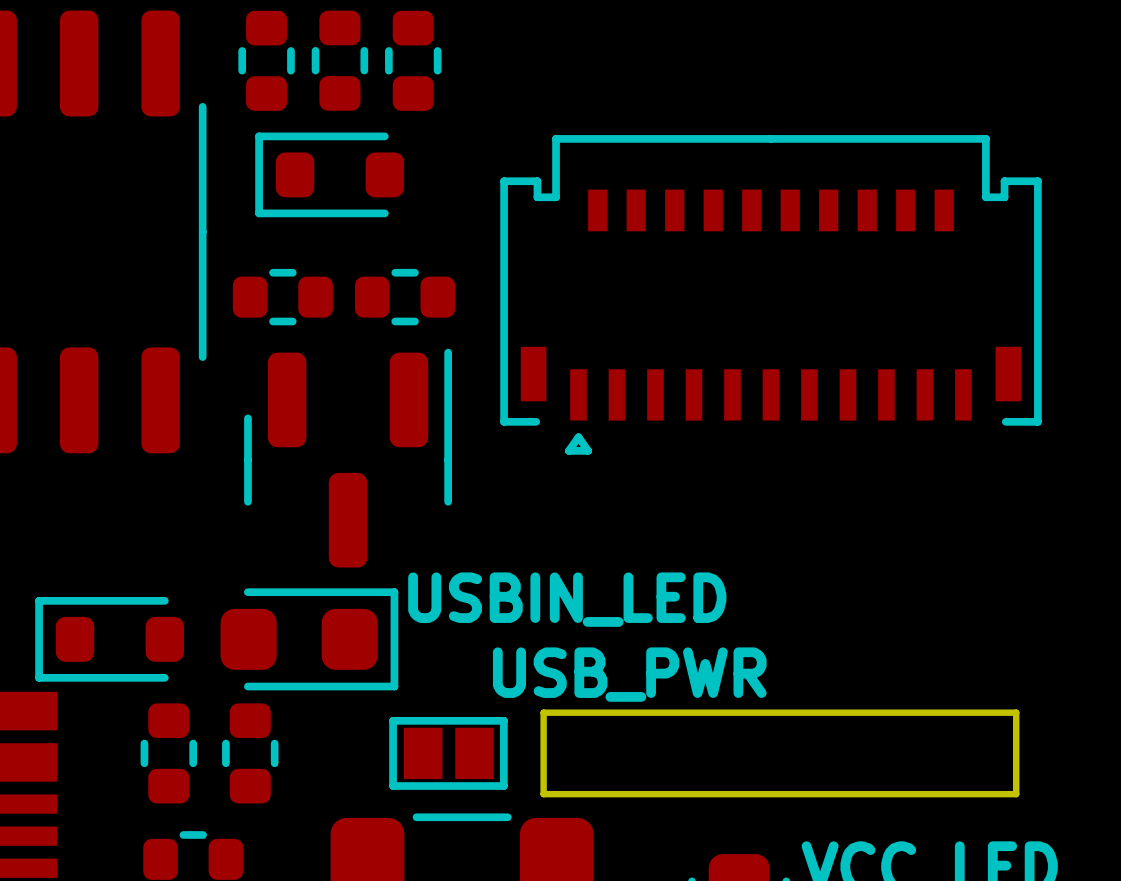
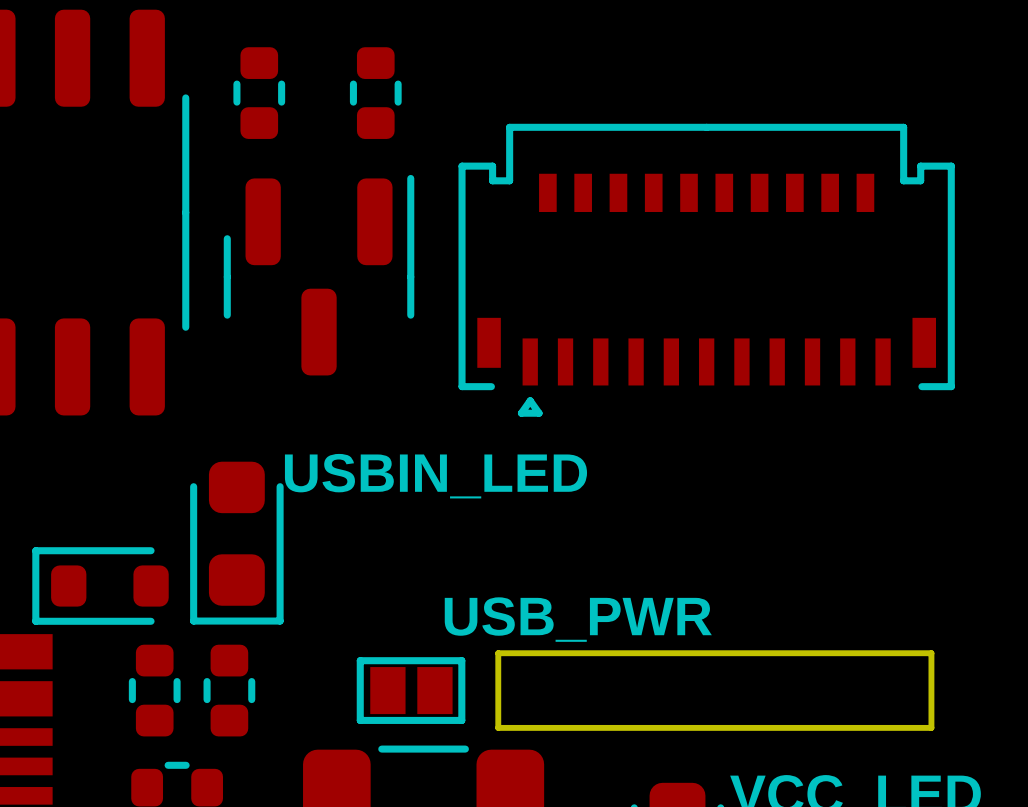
part: (266, 60) -> none
part: (339, 60) -> none
part: (413, 60) -> none
part: none -> (259, 93)
part: none -> (375, 93)
part: (329, 174) -> none
part: (282, 297) -> none
part: (405, 297) -> none
part position: (348, 458) -> (319, 275)
text position: USBIN_LED (567, 599) -> USBIN_LED (435, 476)
part rotation: 0° (309, 639) -> 90° clockwise (236, 543)

